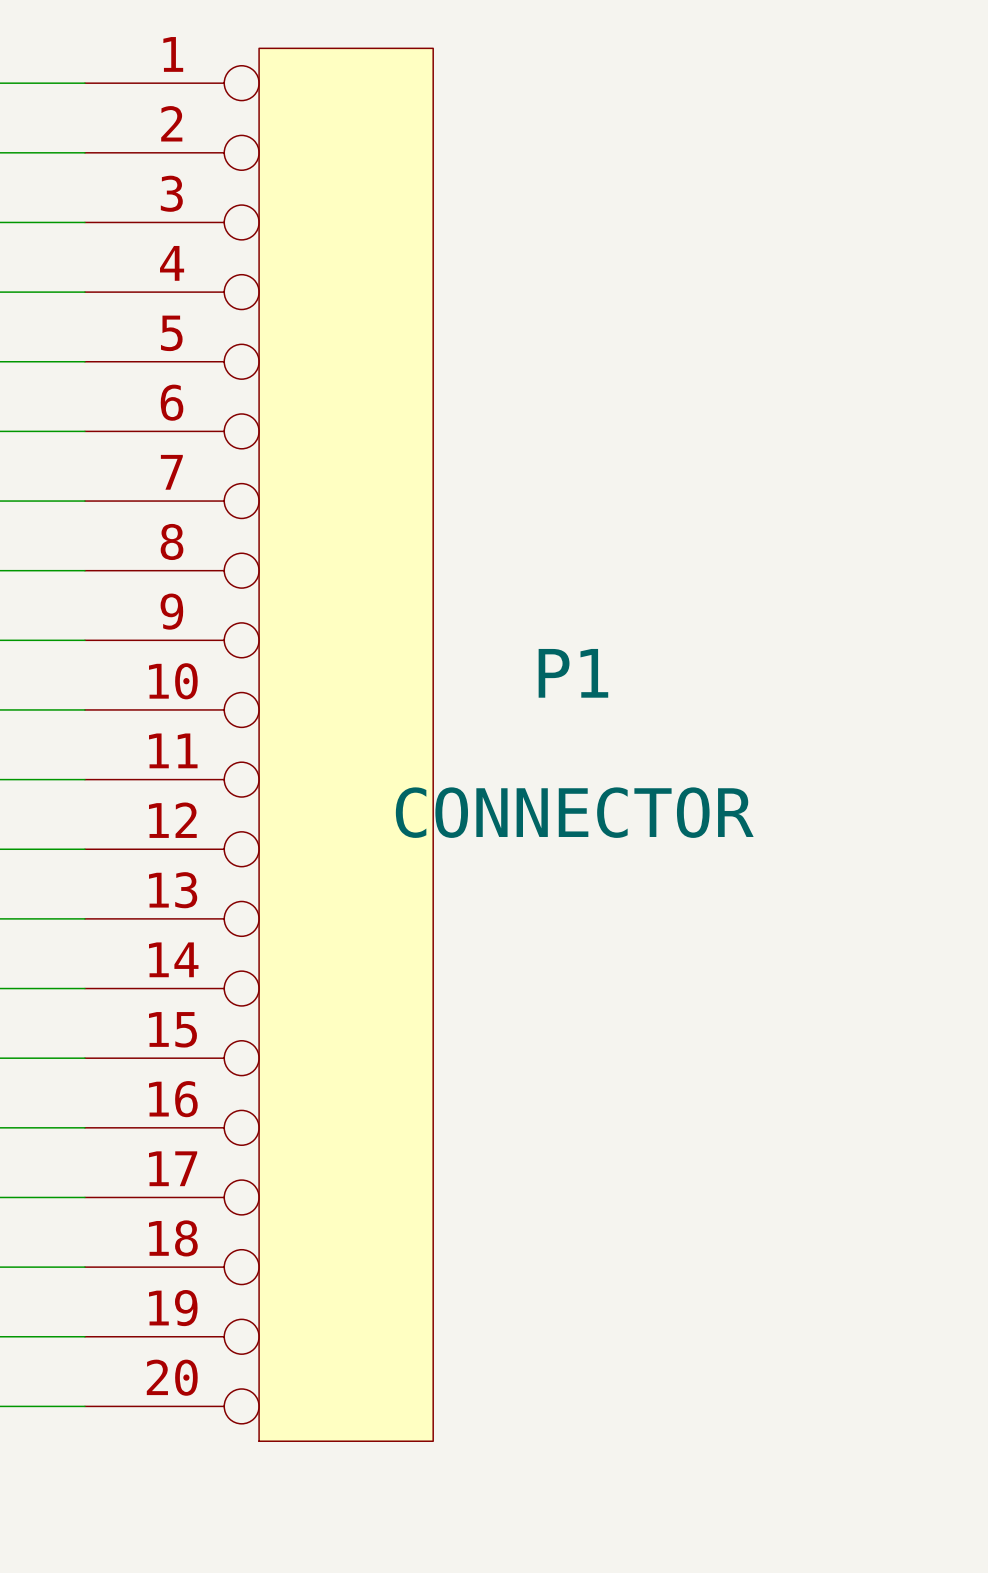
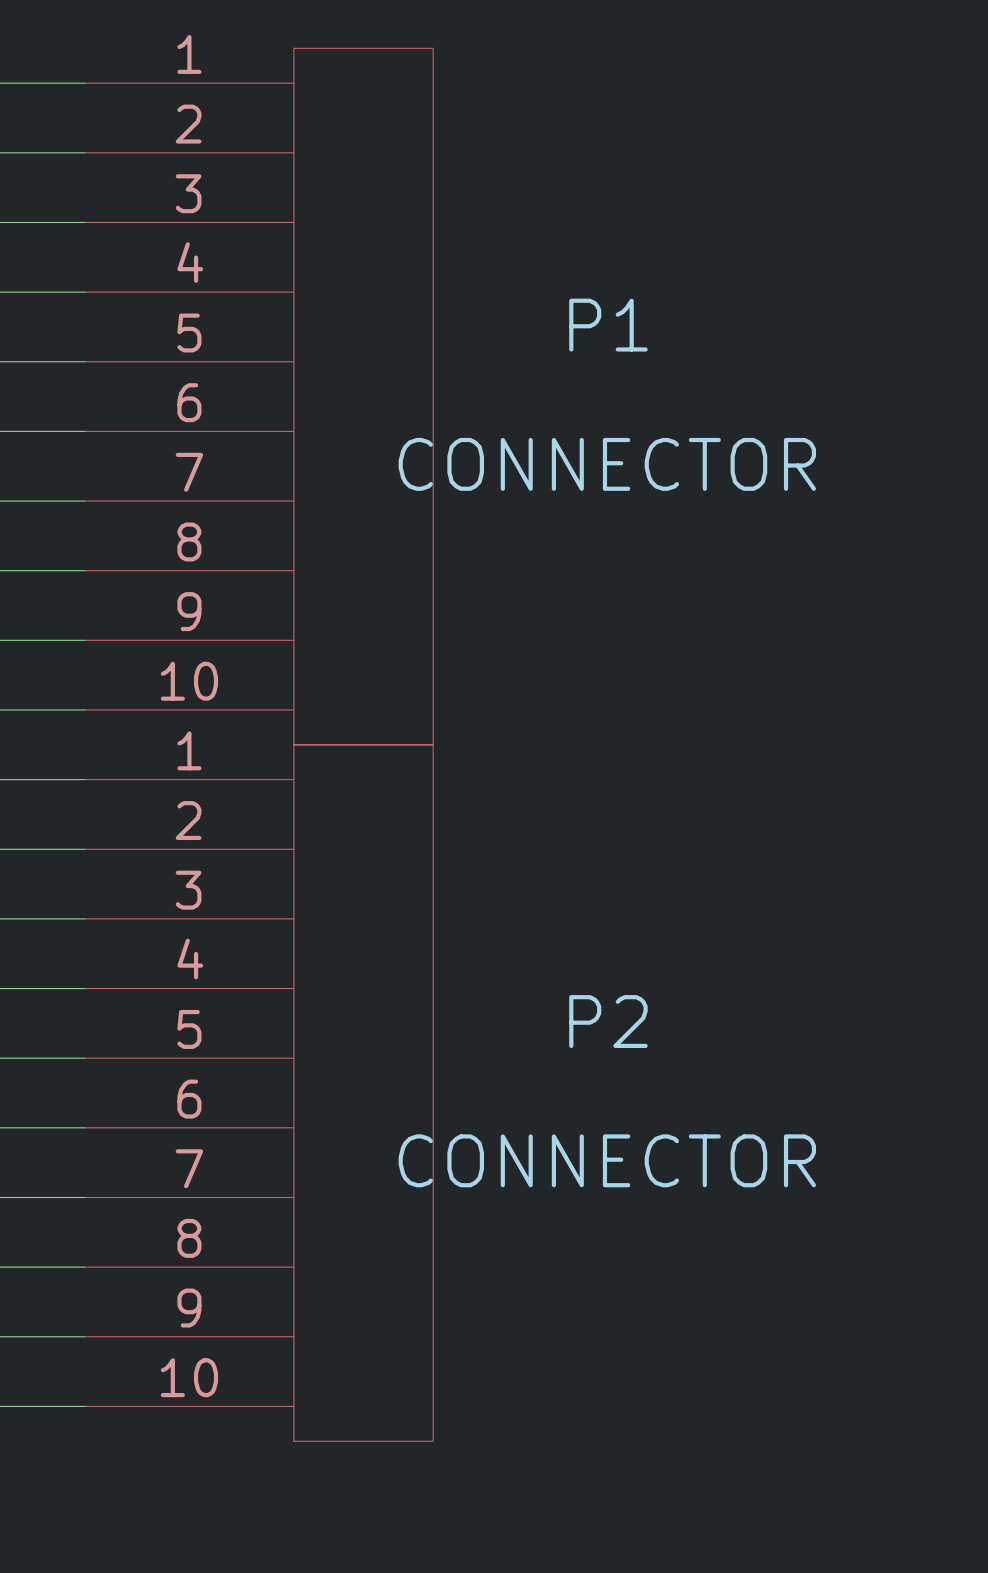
P1 symbol: [84, 48, 434, 1442] -> [84, 48, 434, 745]
P2: none -> CONNECTOR (259, 1093)

